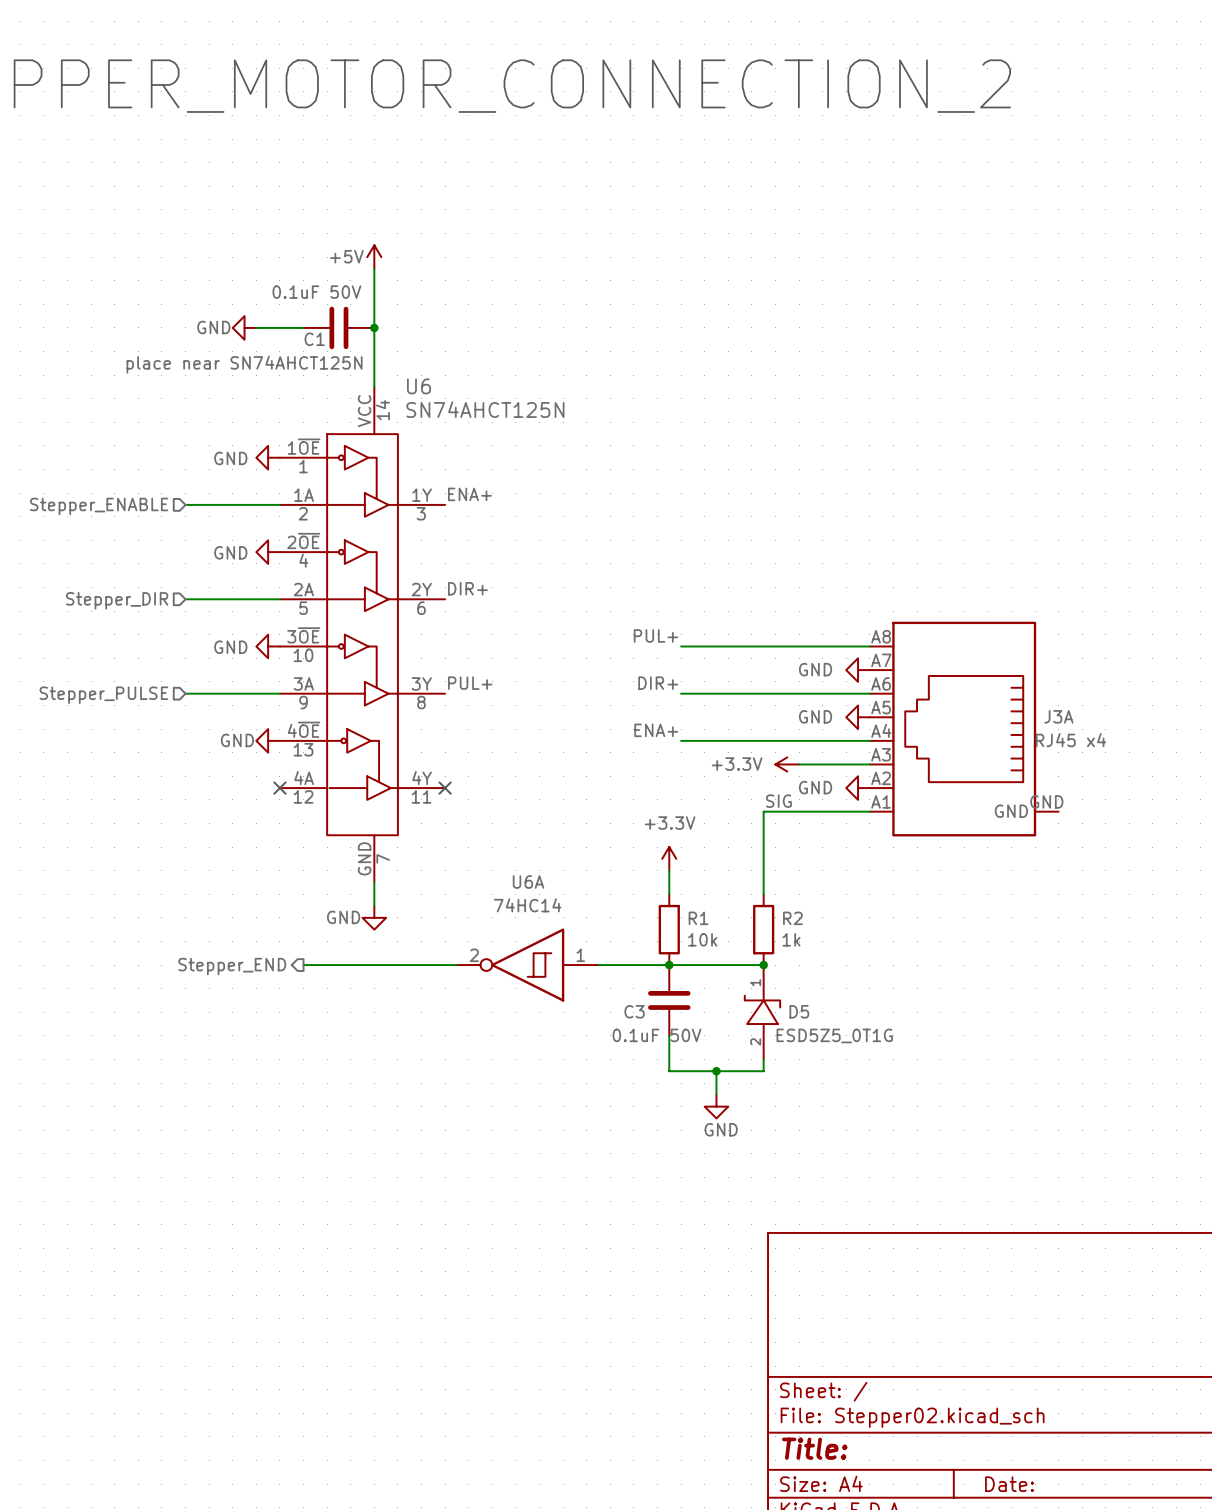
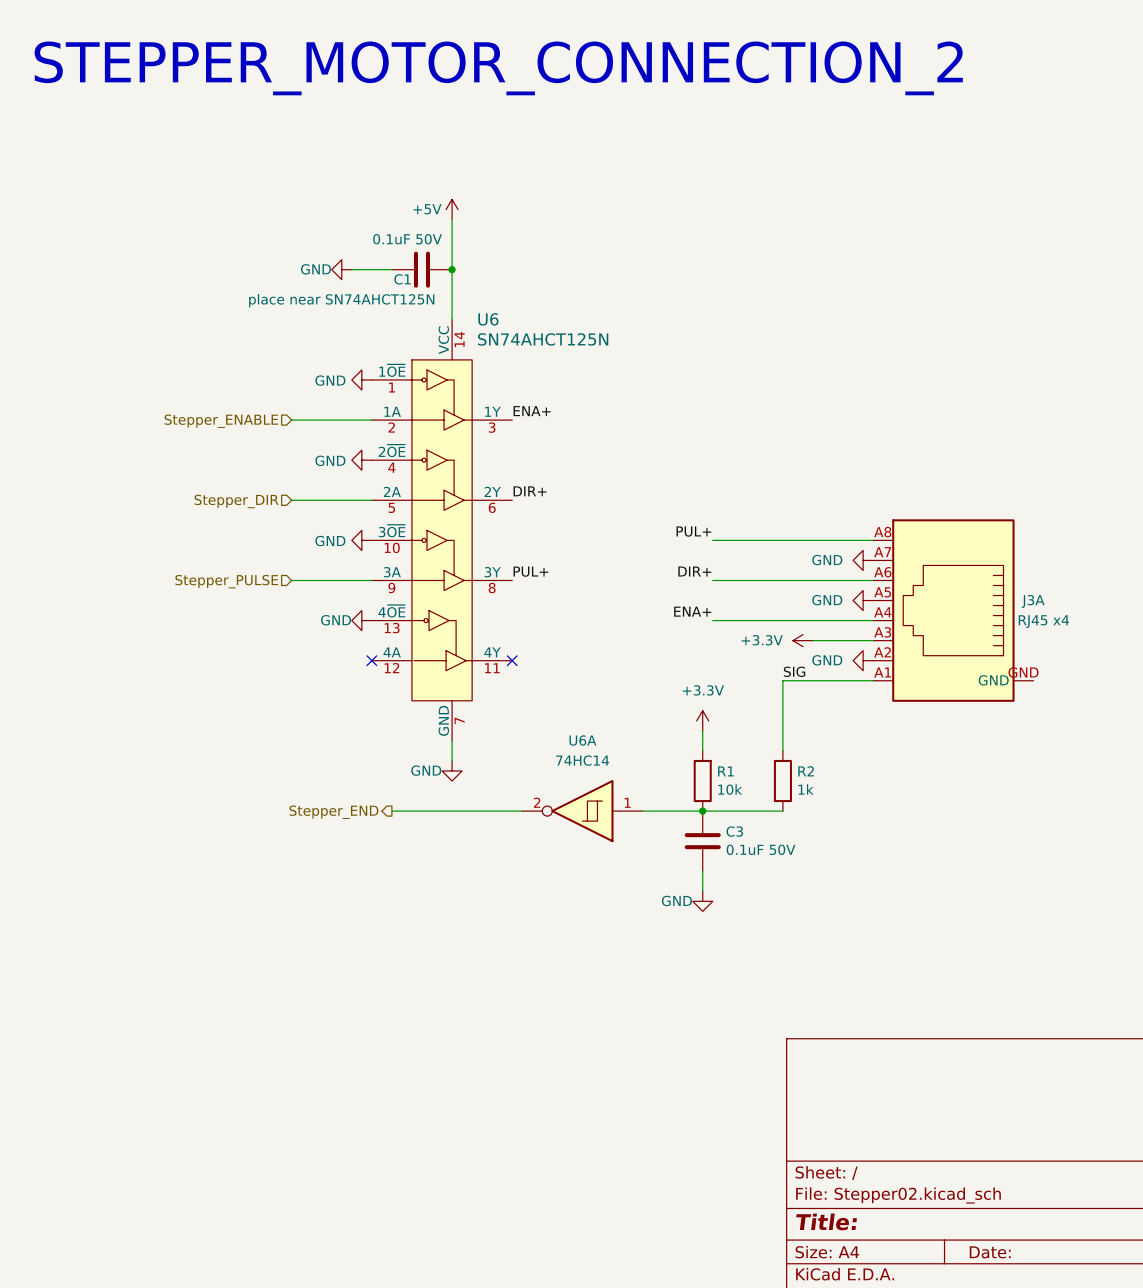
junction: (763, 965) -> none
C3 name position: C3 (634, 1011) -> C3 (734, 831)
D5: ESD5Z5_0T1G (762, 1012) -> none
C3 value position: 0.1uF 50V (657, 1035) -> 0.1uF 50V (761, 849)
wire: (669, 1059) (669, 1071) (763, 1071) (763, 1059) -> none
wire: (716, 1071) (716, 1094) -> none
junction: (716, 1071) -> none
power symbol position: GND (716, 1106) -> GND (702, 901)
power symbol text position: GND (721, 1129) -> GND (676, 900)

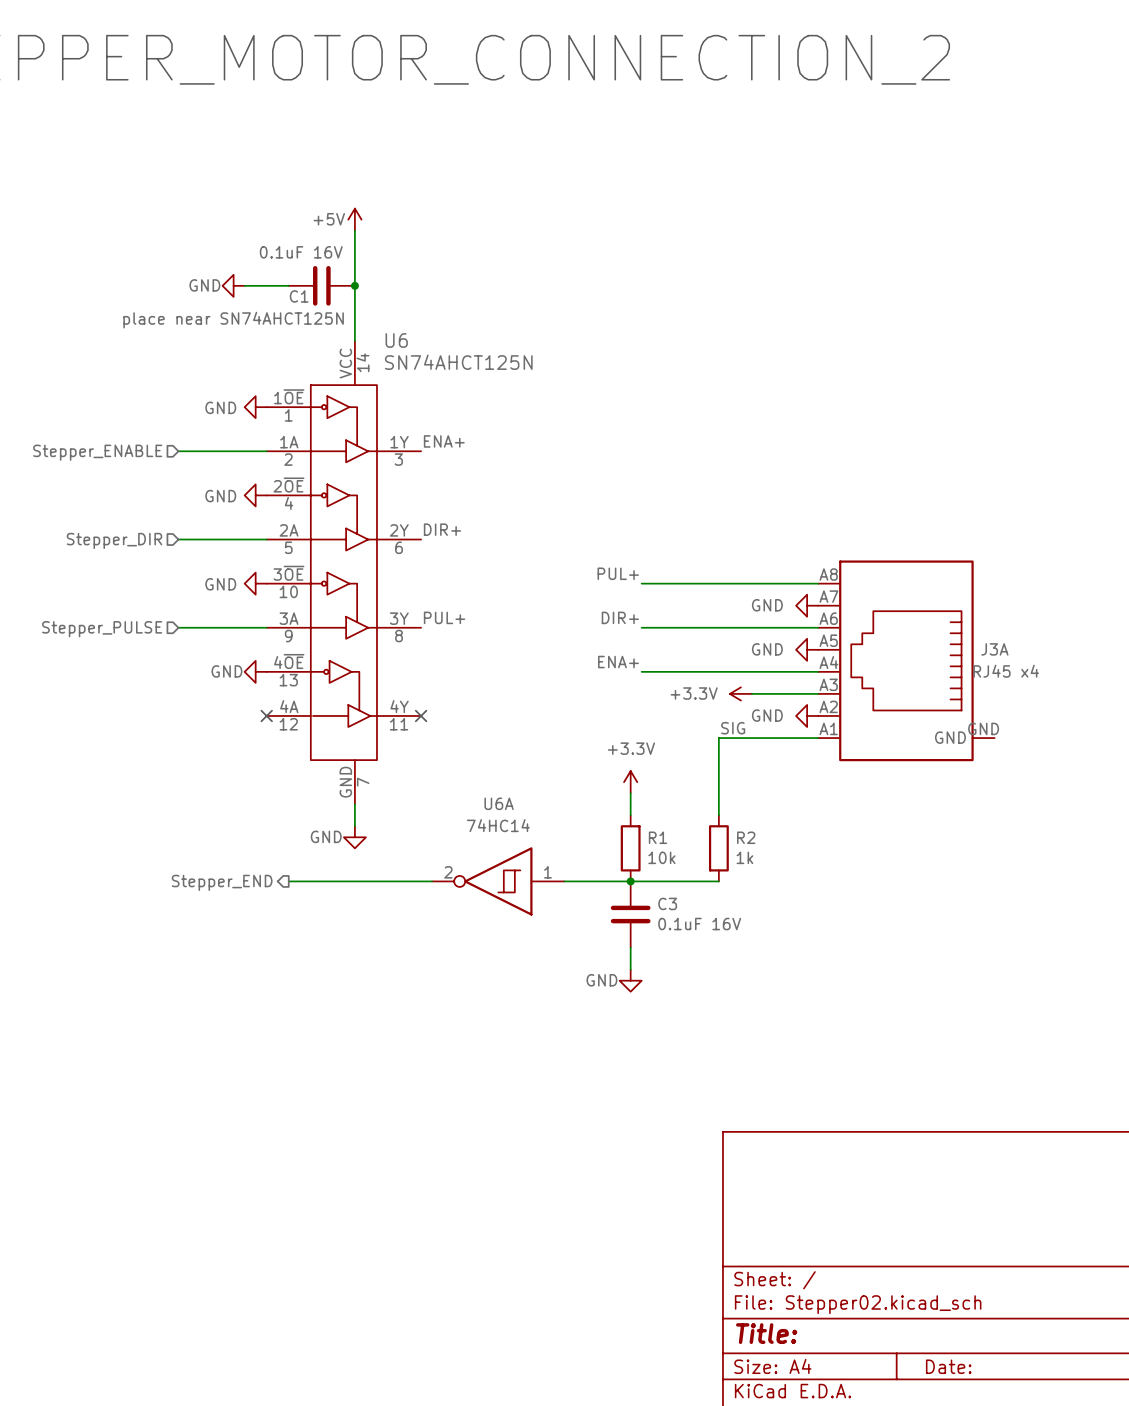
C1 value: 0.1uF 50V (407, 239) -> 0.1uF 16V (301, 252)
C3 value: 0.1uF 50V (761, 849) -> 0.1uF 16V (699, 924)

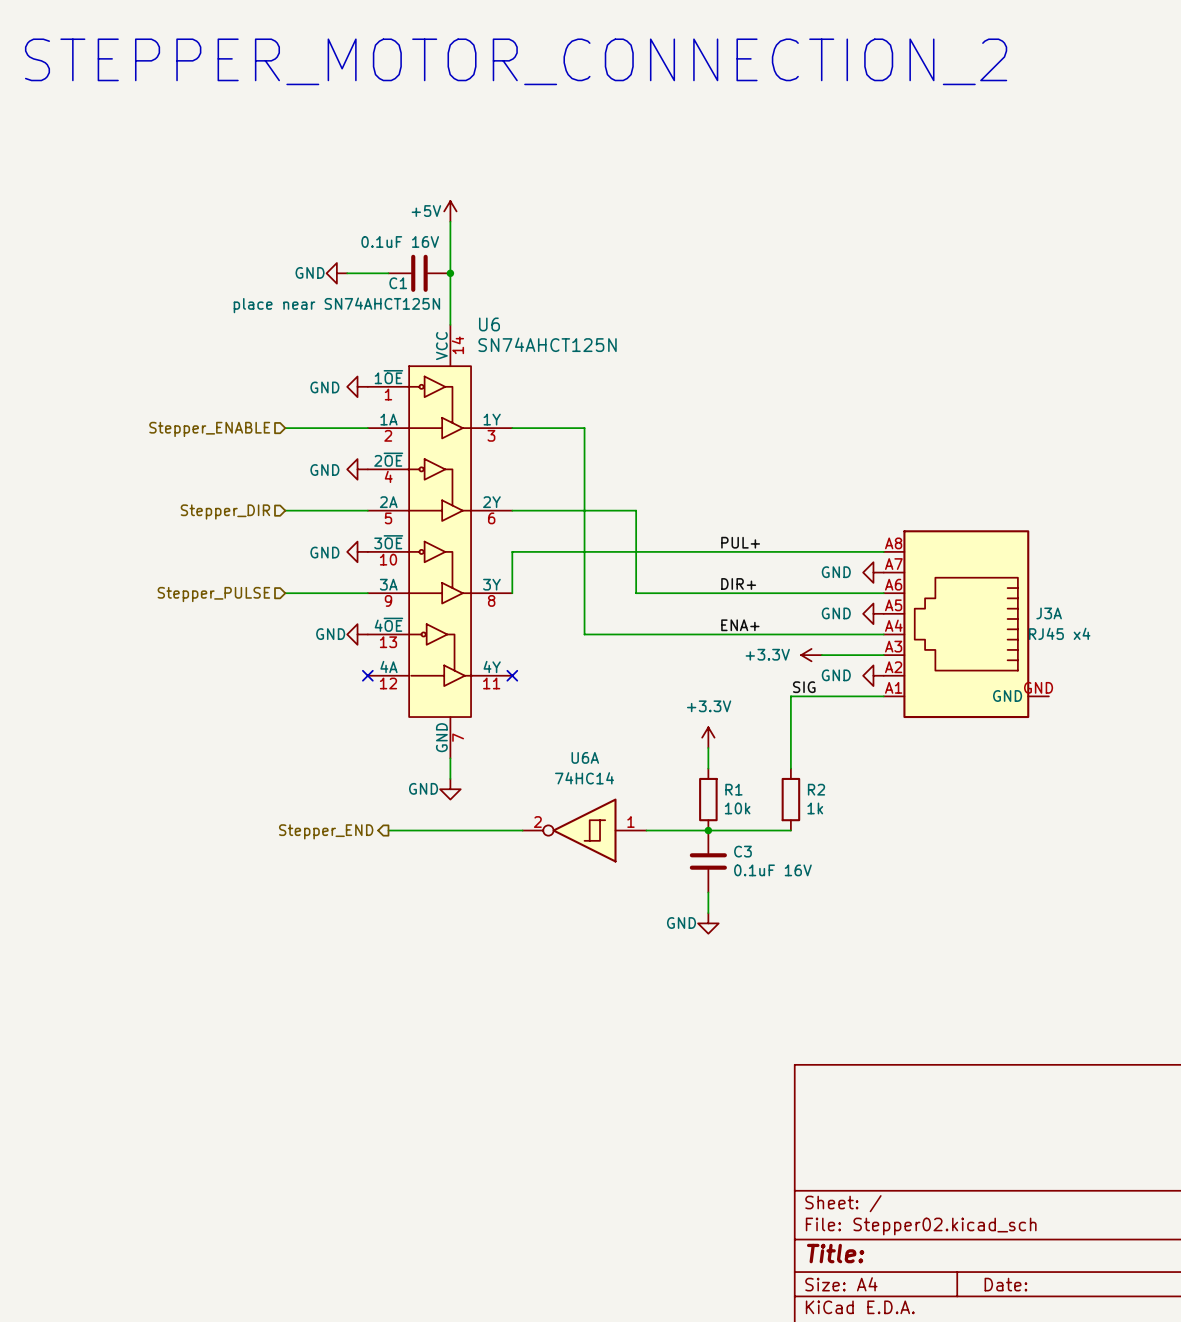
label: ENA+ (444, 441) -> none
wire: none -> (512, 428) (584, 428) (584, 634) (718, 634)
label: DIR+ (442, 529) -> none
wire: none -> (512, 510) (636, 510) (636, 593) (718, 593)
label position: PUL+ (618, 573) -> PUL+ (740, 542)
wire: none -> (718, 551) (512, 551) (512, 593)
label: PUL+ (444, 617) -> none
label position: DIR+ (620, 617) -> DIR+ (738, 583)
label position: ENA+ (618, 662) -> ENA+ (740, 625)

